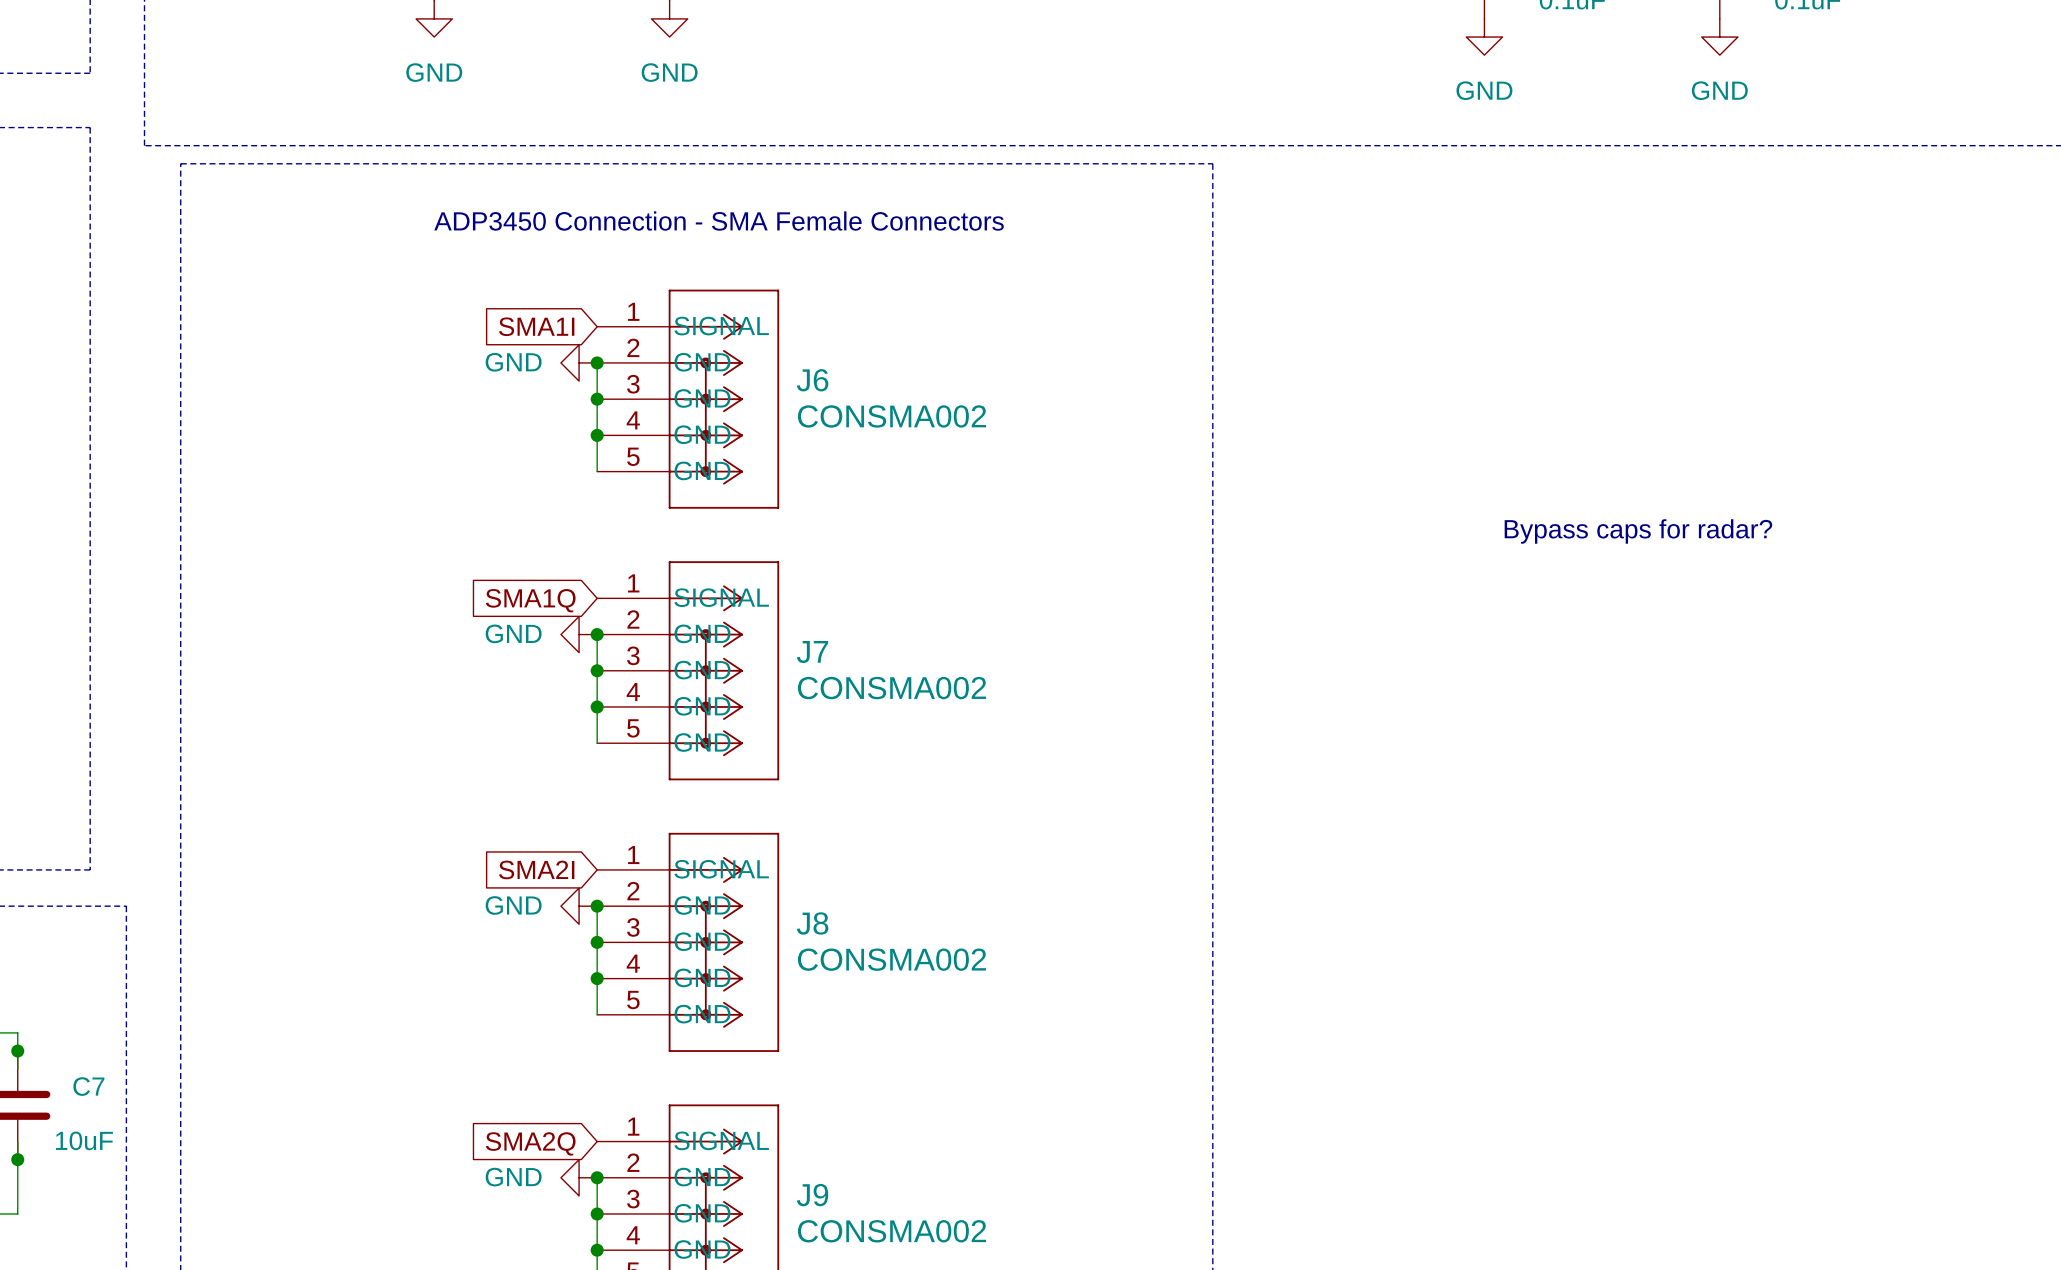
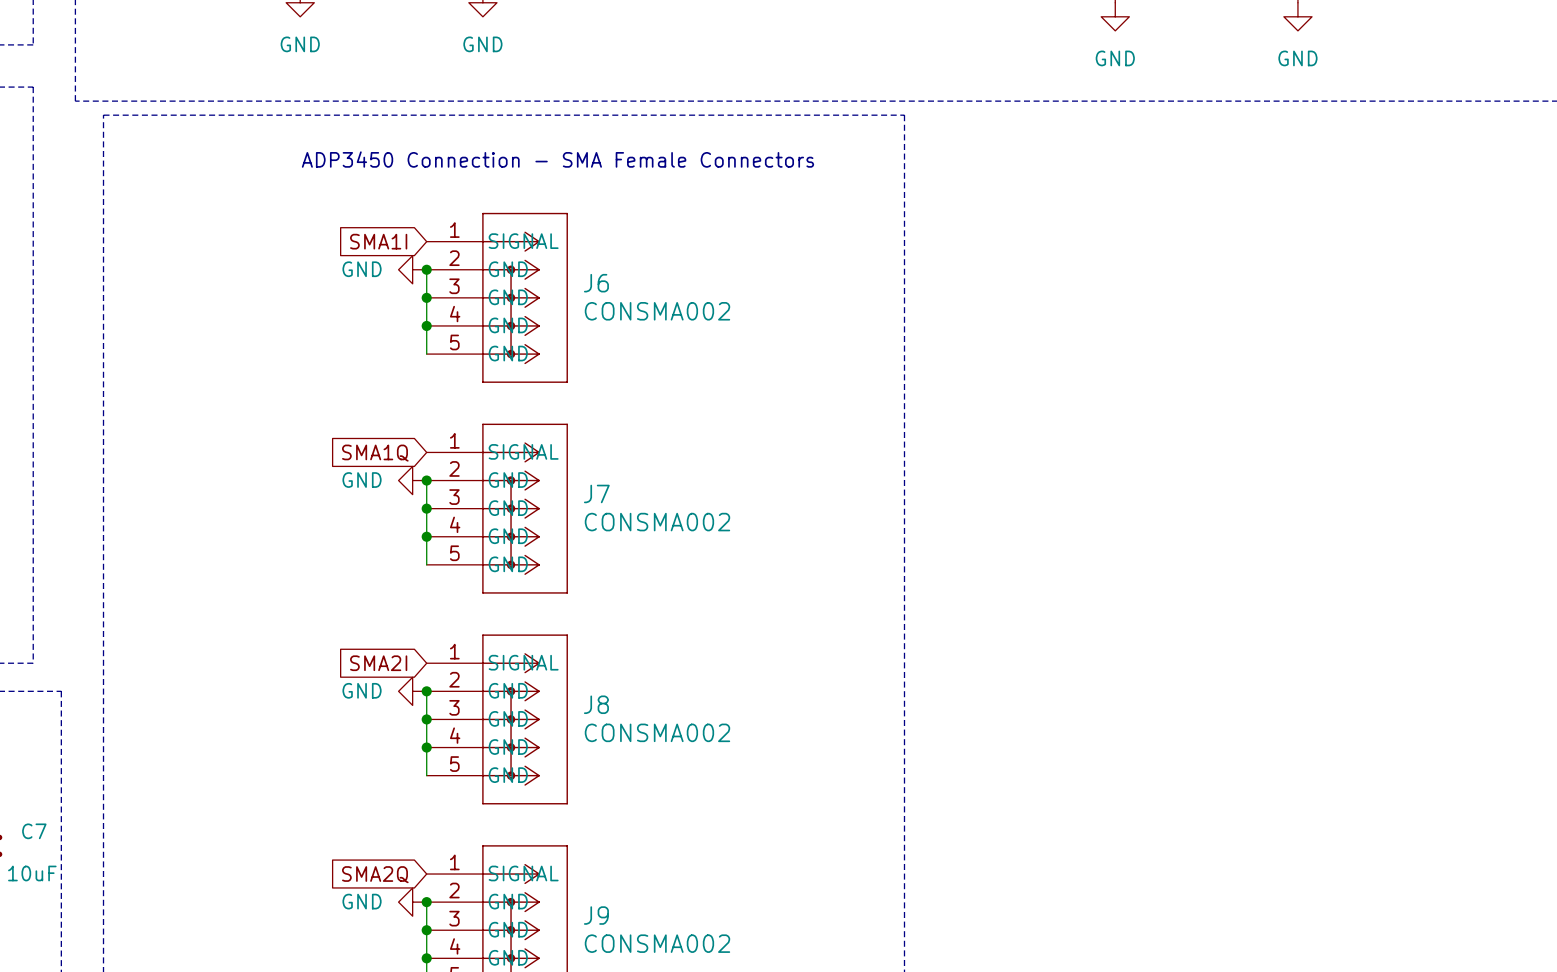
text: Bypass caps for radar? (1638, 531) -> none

